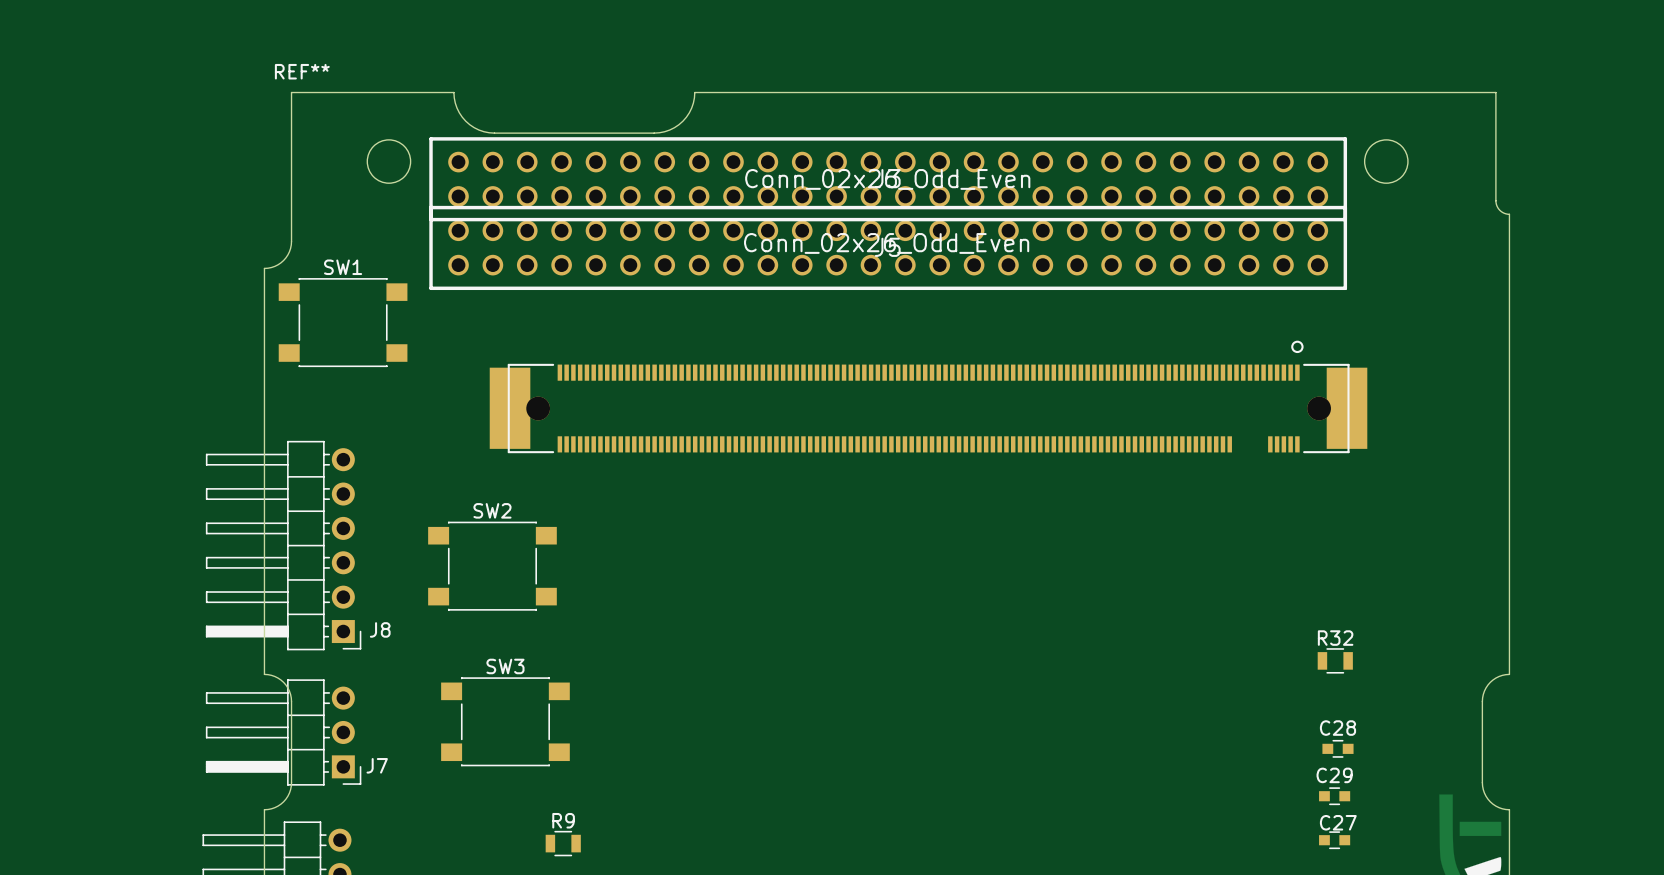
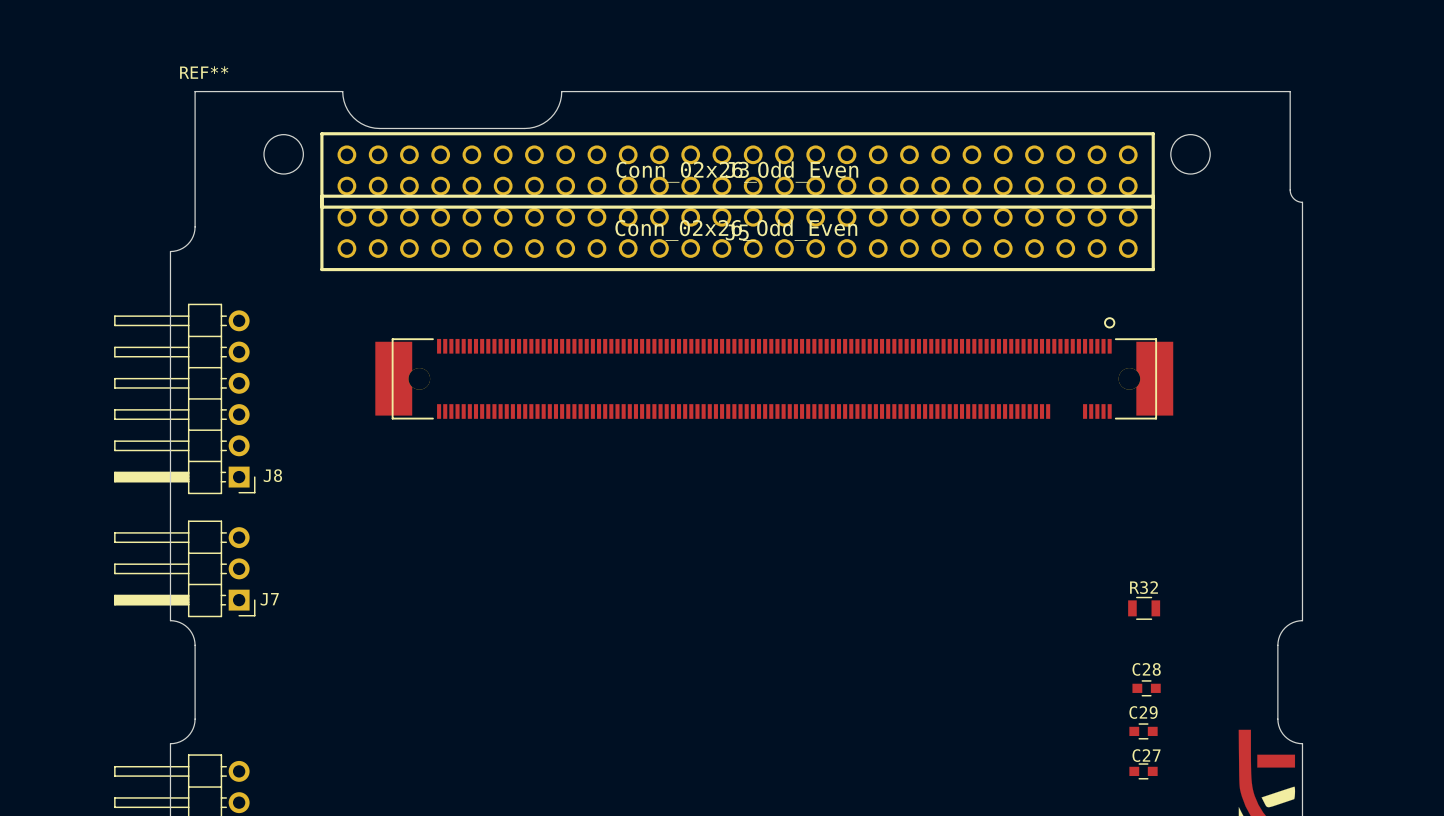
SW1: (343, 322) -> none
J8 position: (283, 545) -> (184, 398)
SW2: (492, 566) -> none
SW3: (505, 721) -> none
J7 position: (283, 732) -> (184, 568)
R9: (563, 843) -> none

